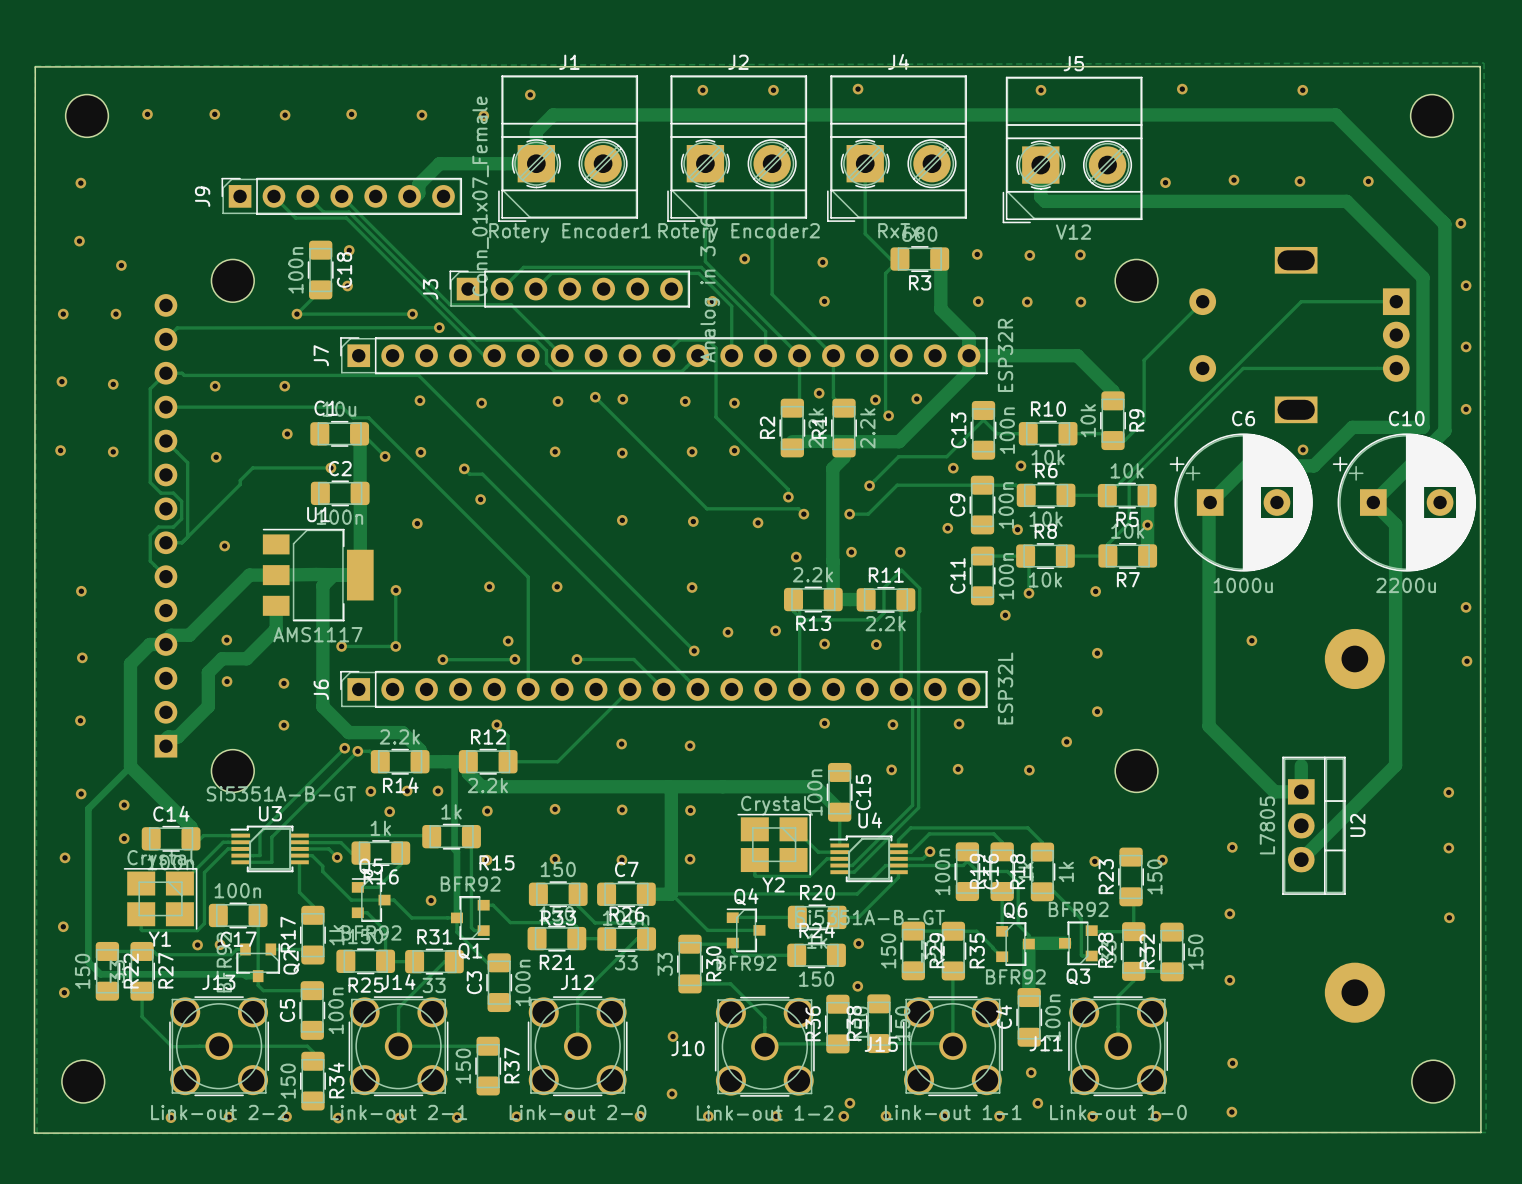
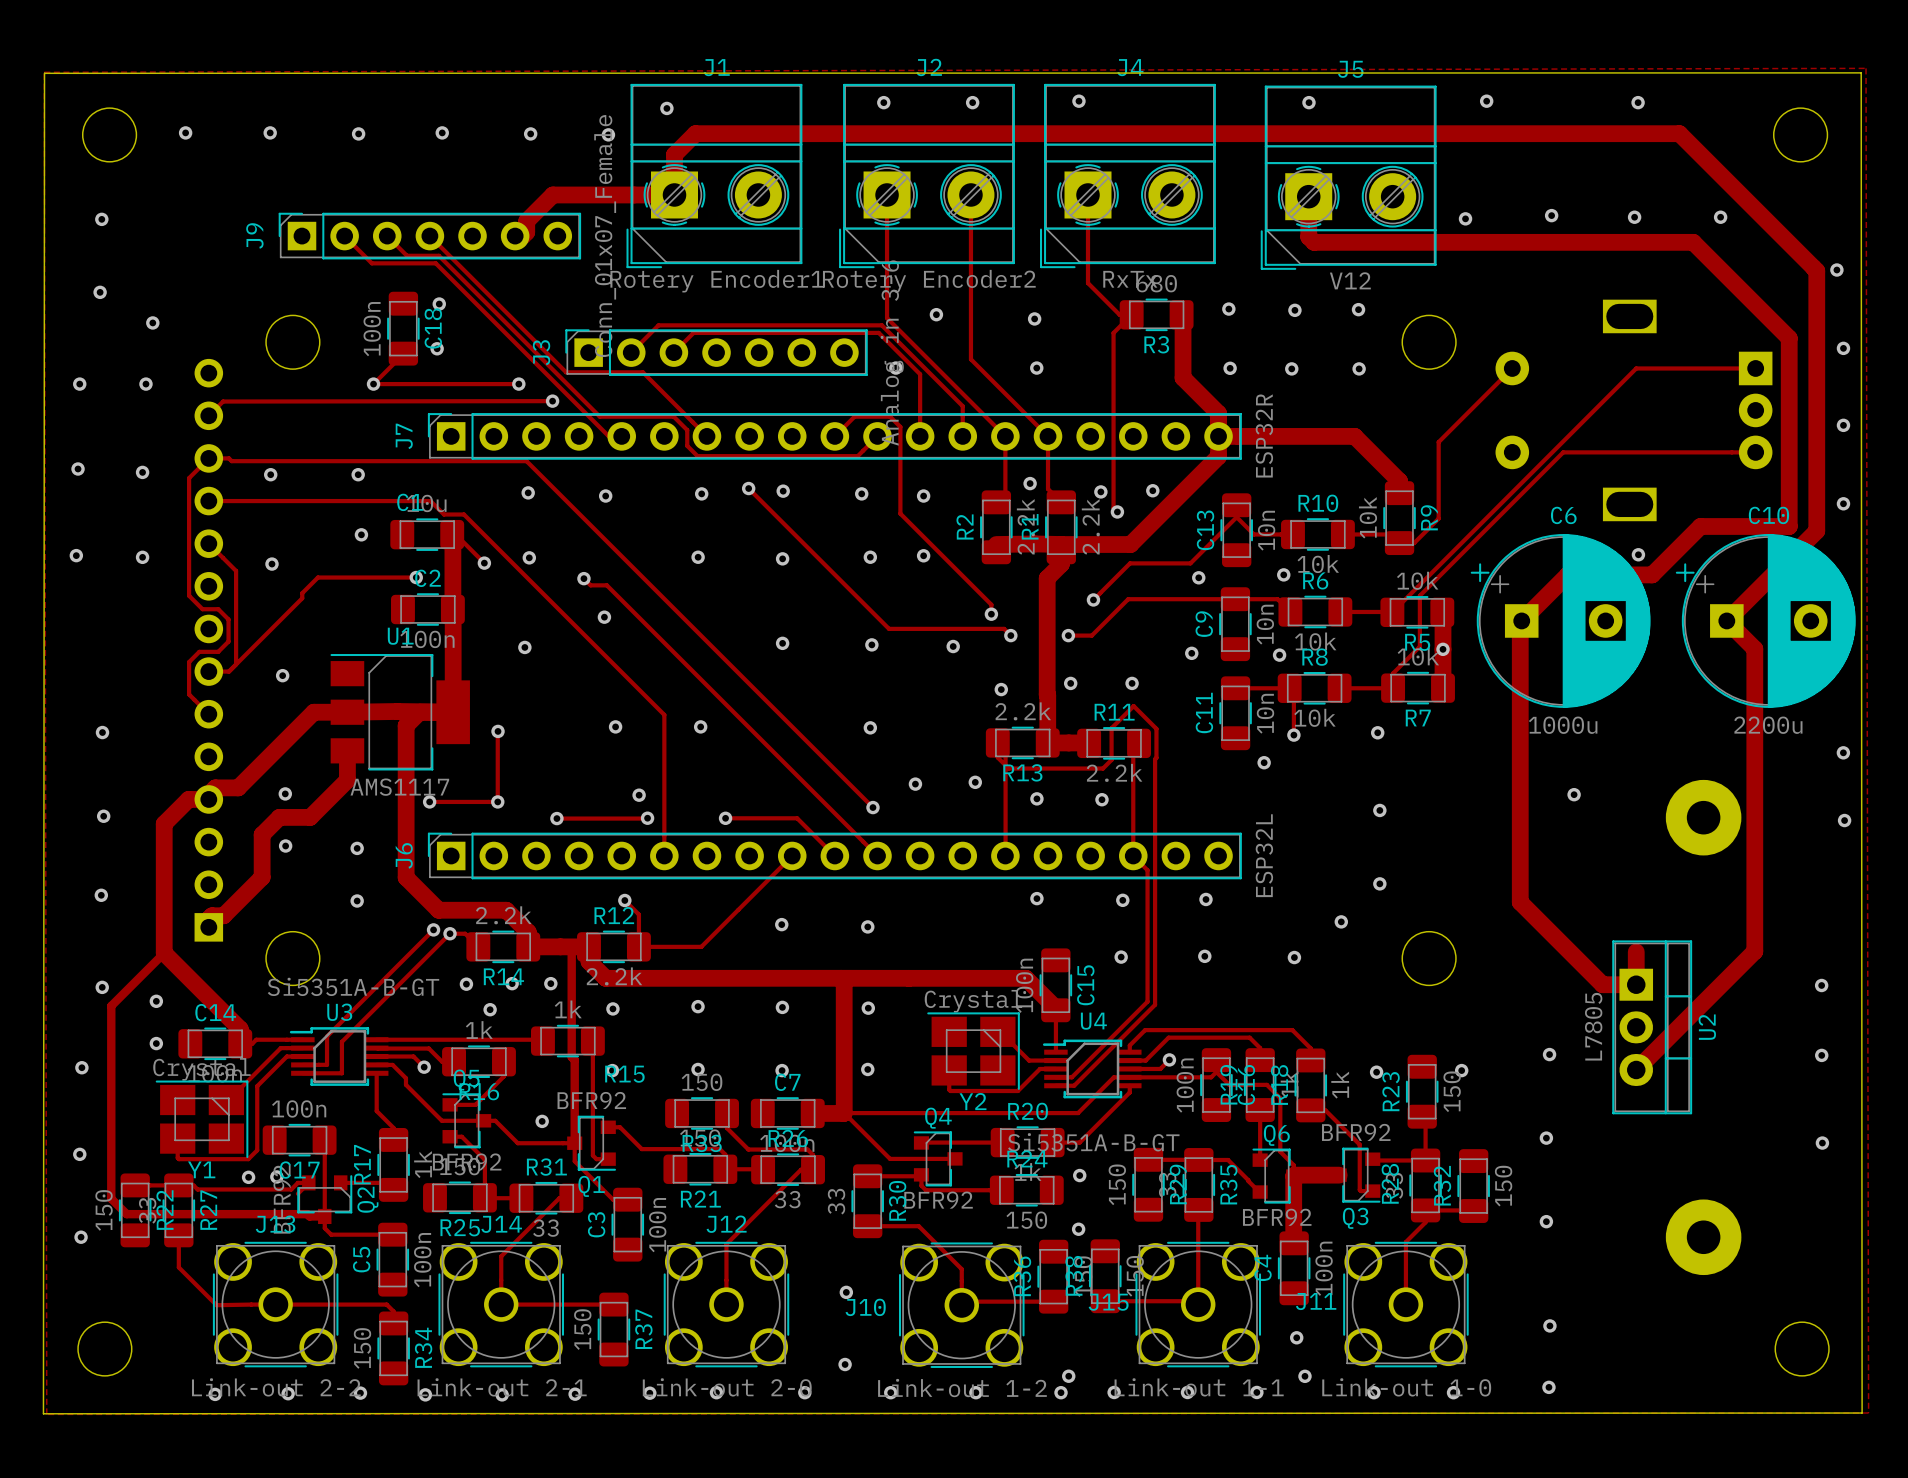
C13 value: 100n (1007, 430) -> 10n (1266, 530)
C9 value: 100n (1006, 505) -> 10n (1265, 624)
C11 value: 100n (1006, 576) -> 10n (1265, 713)

